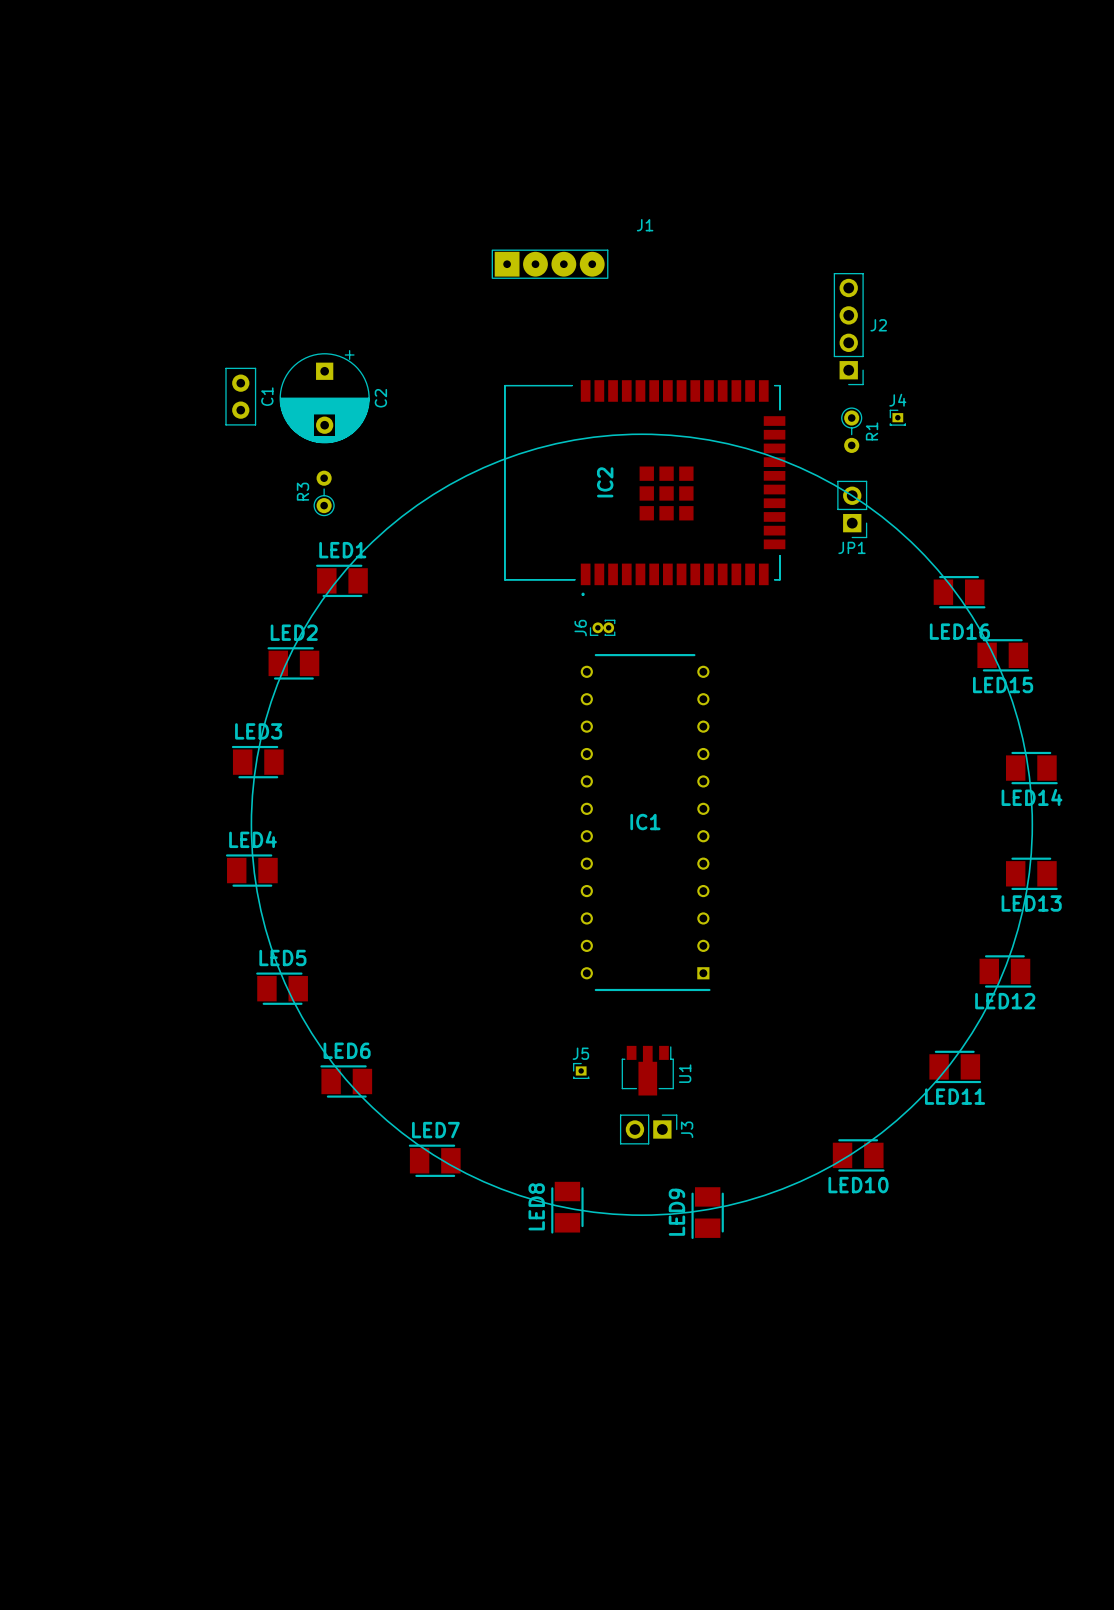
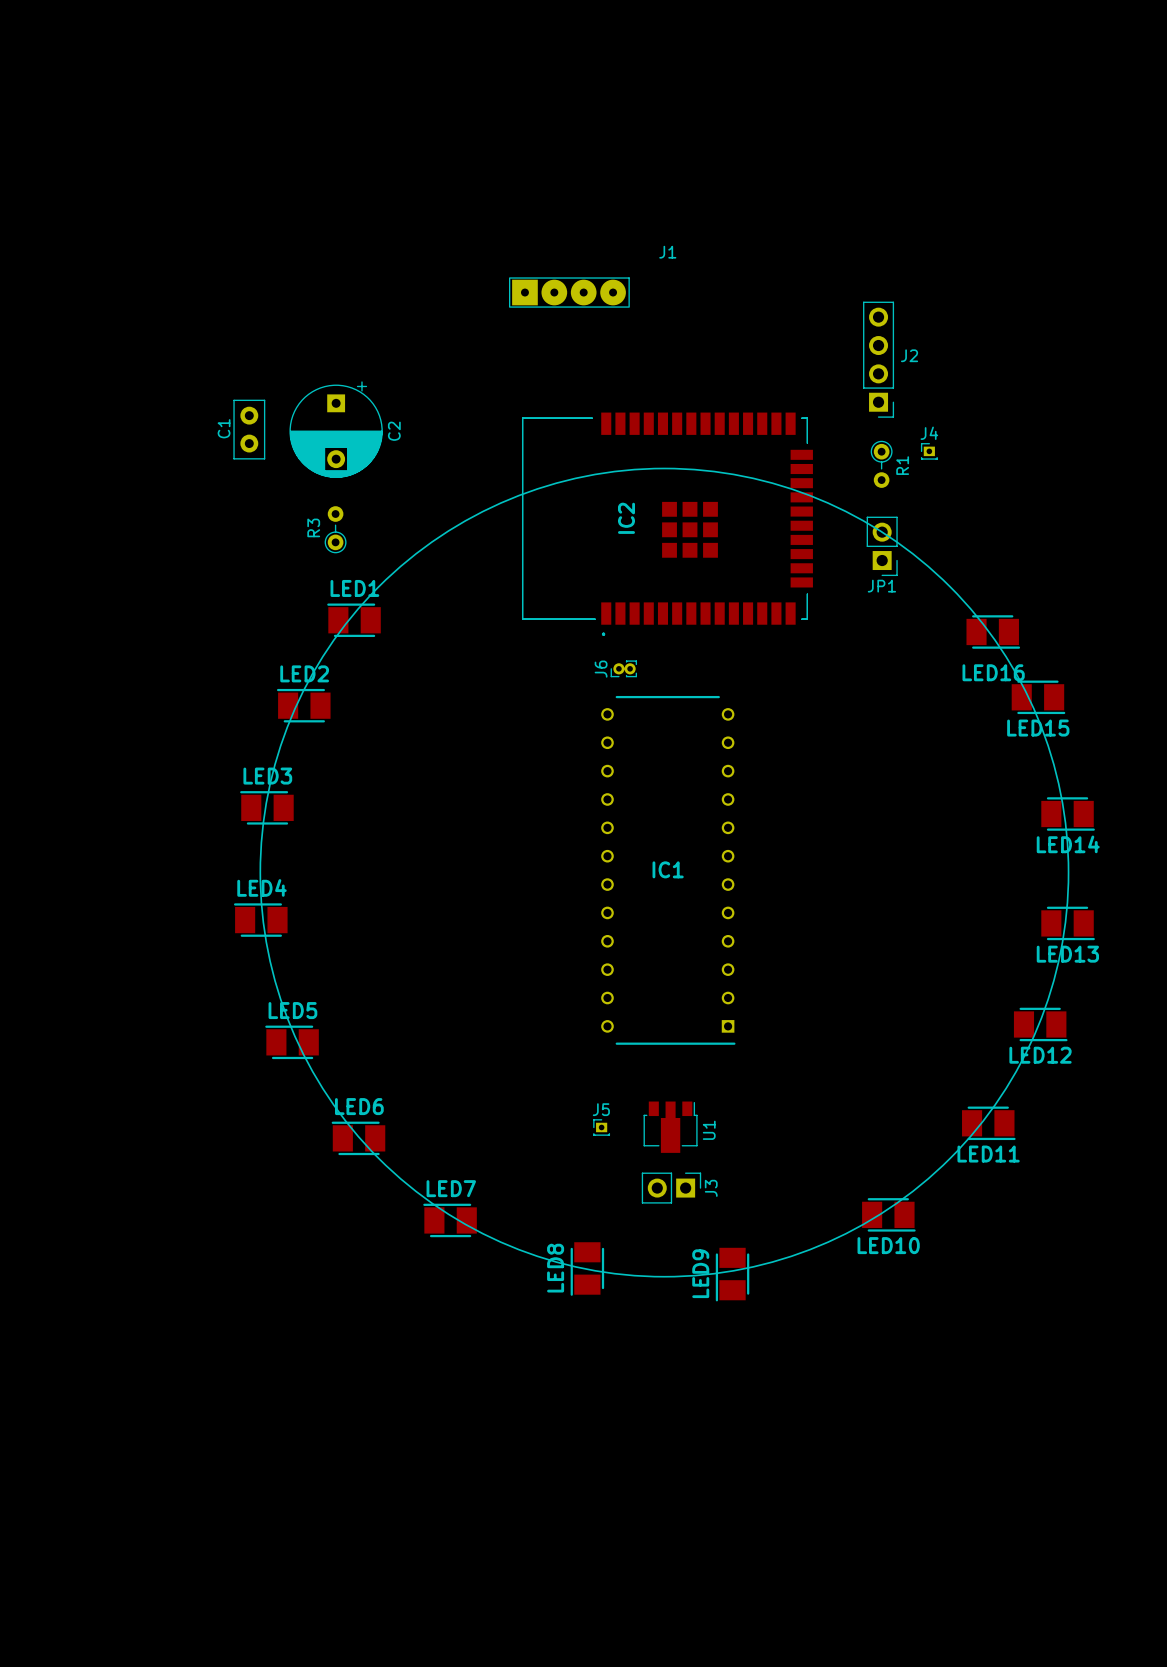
C1 name position: C1 (267, 396) -> C1 (224, 428)

